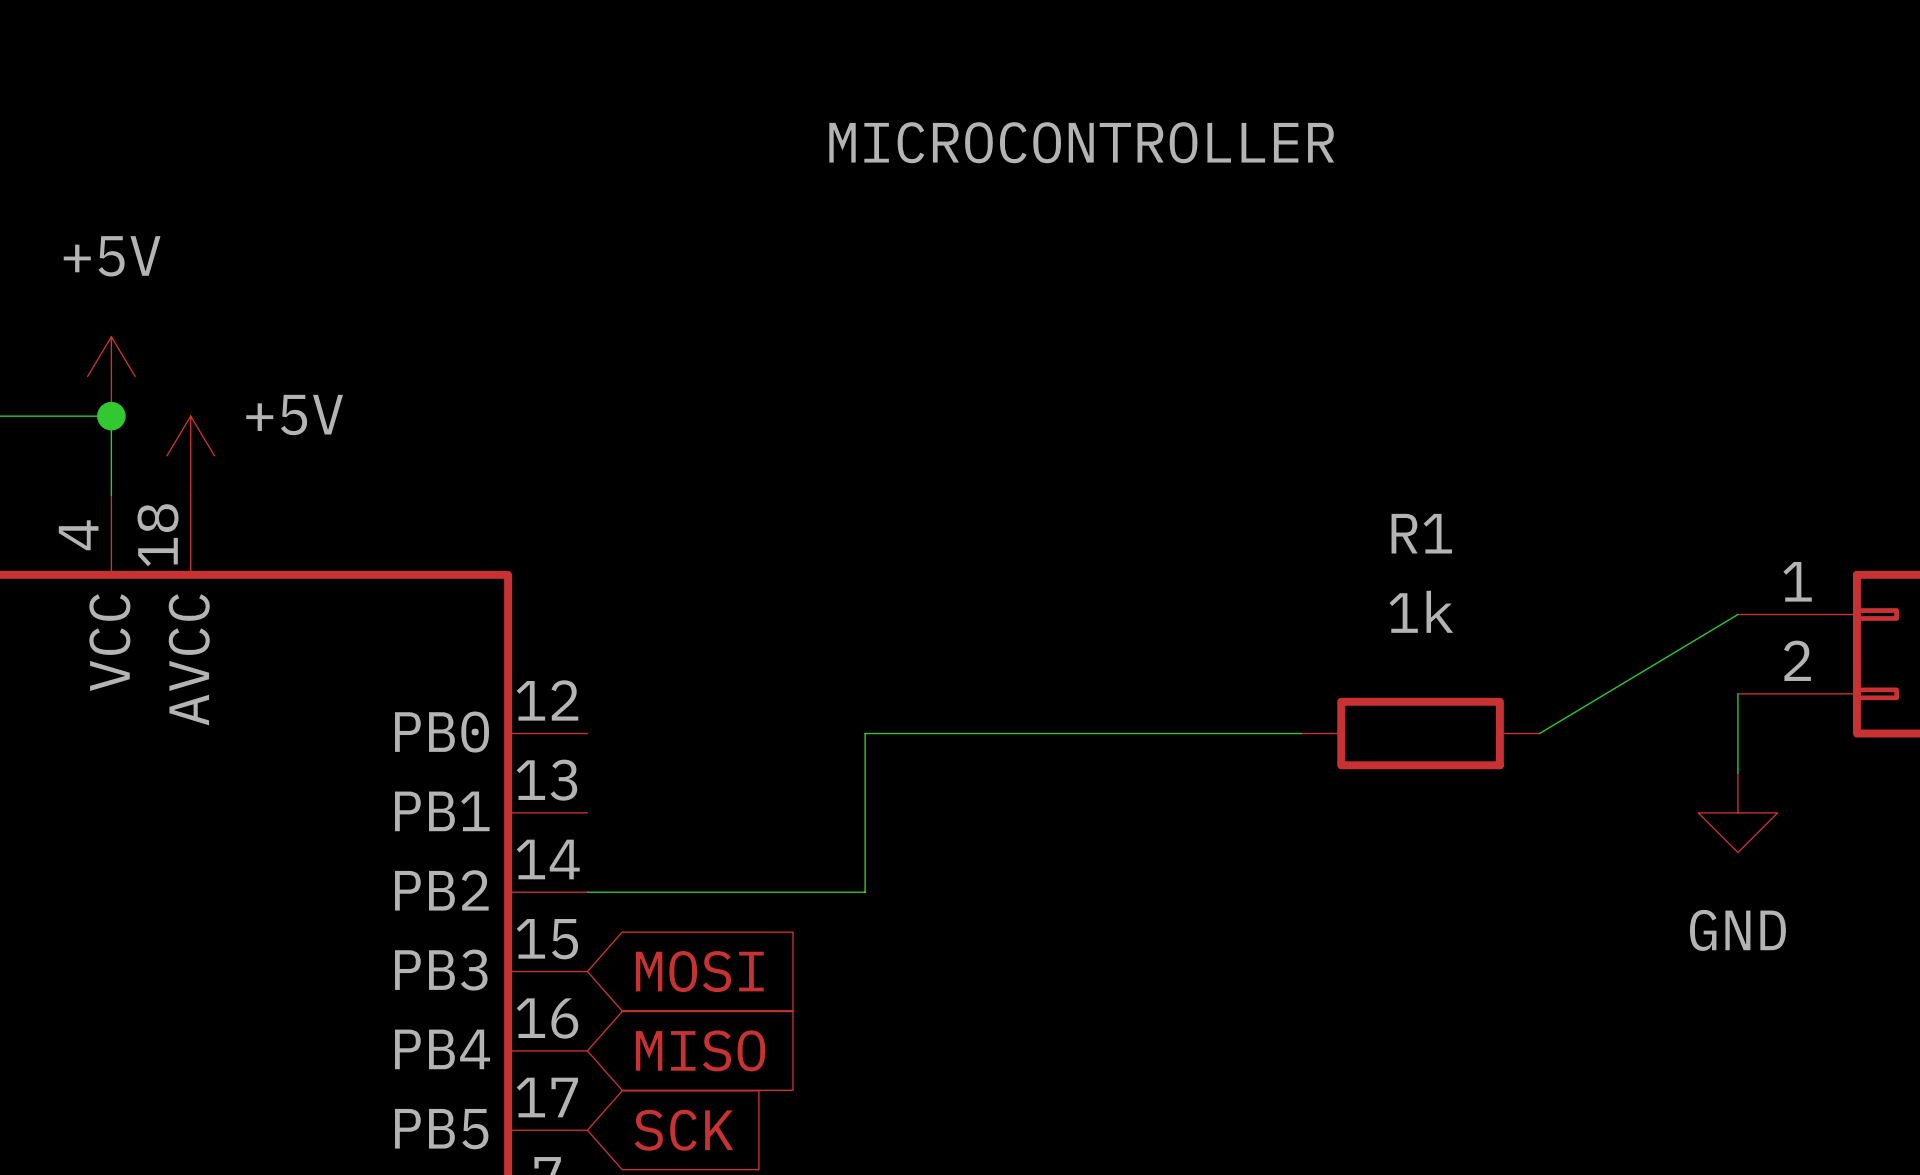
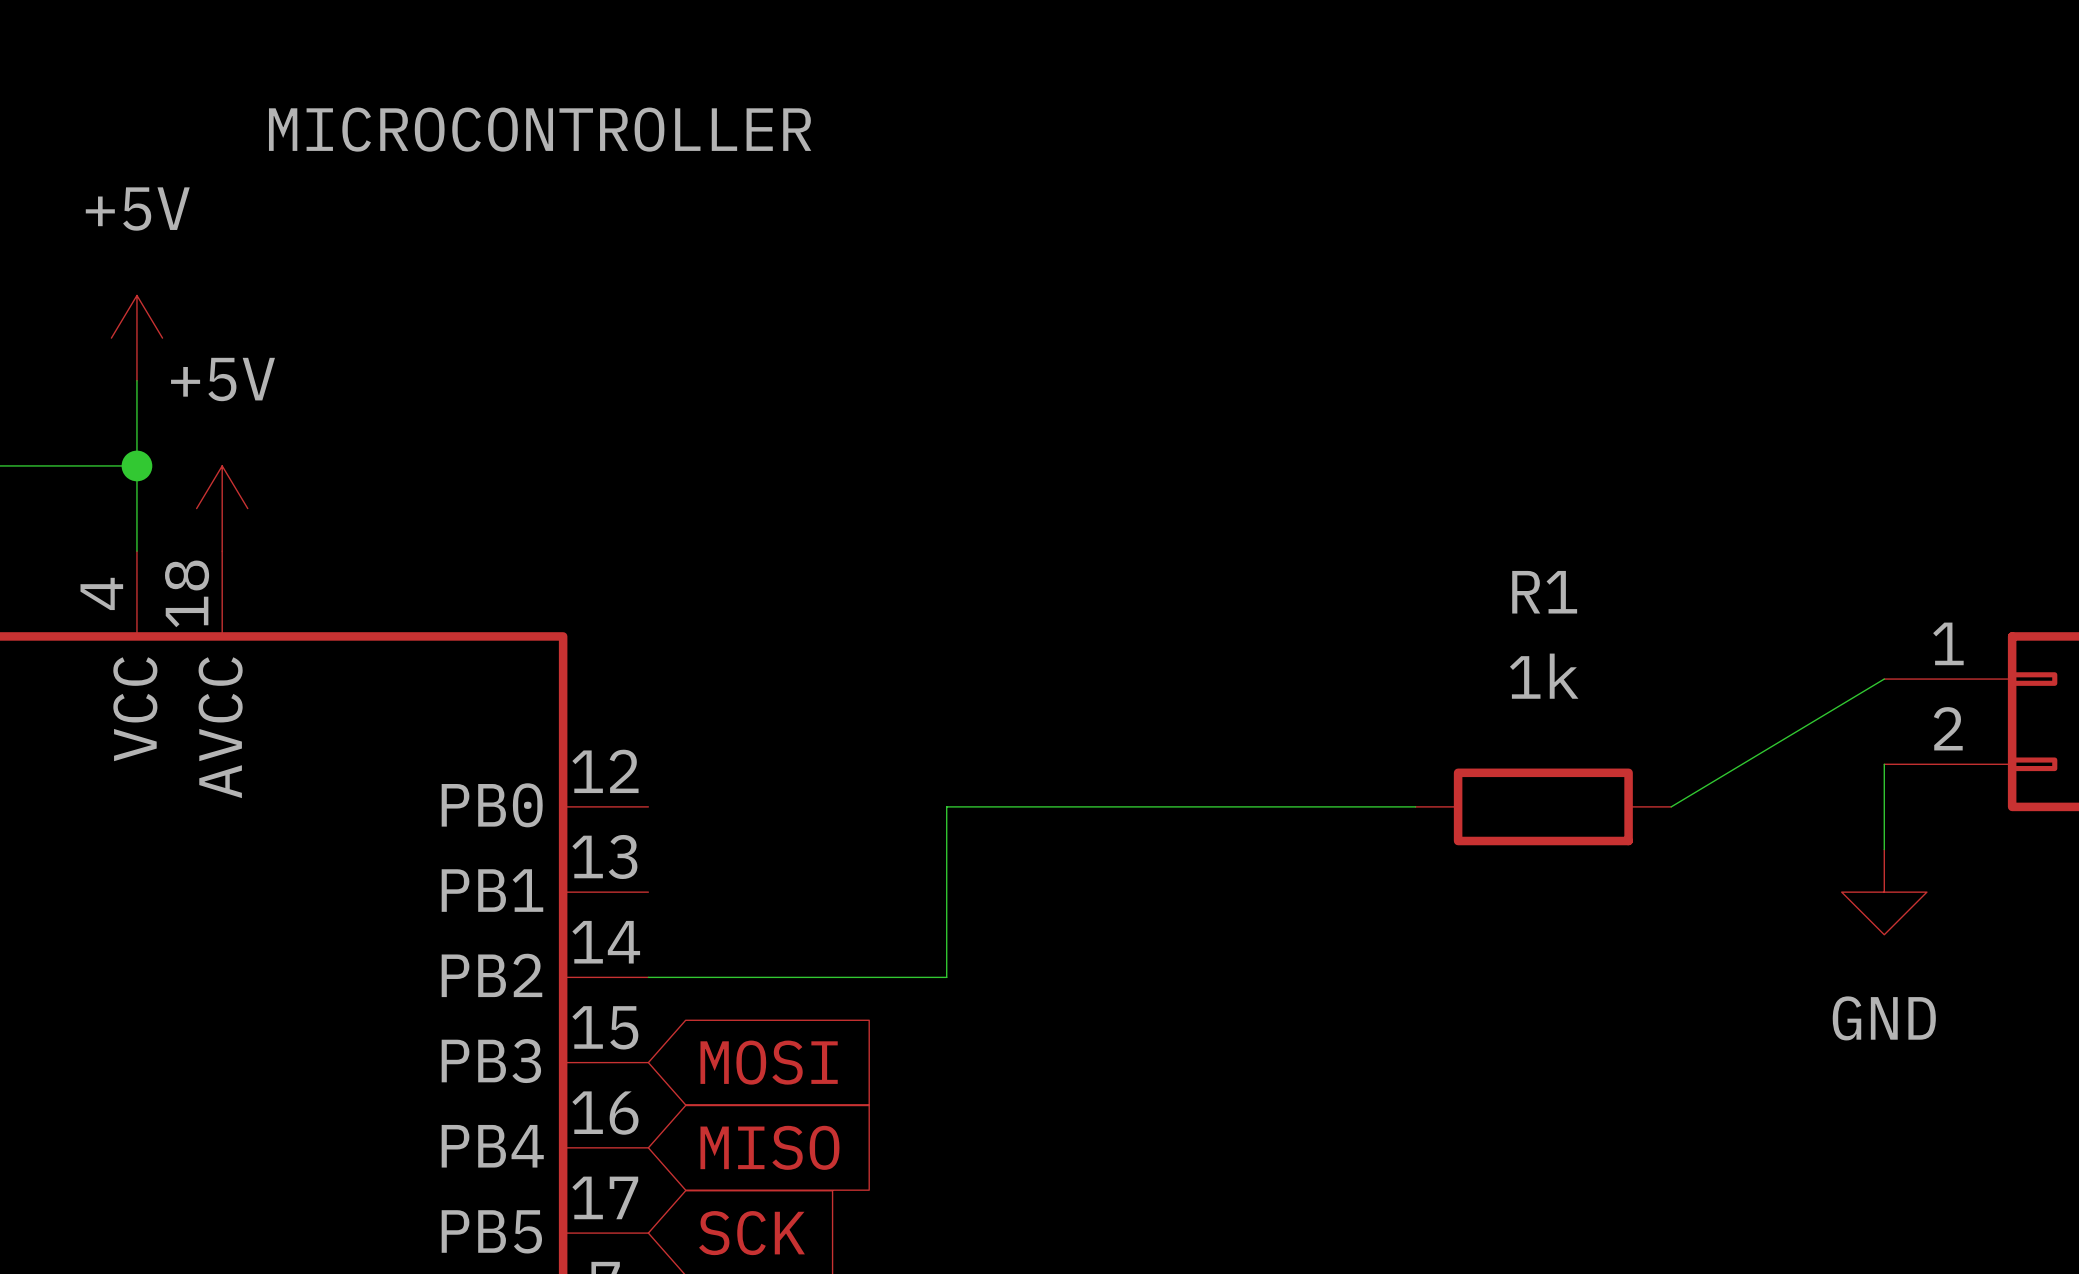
label position: MICROCONTROLLER (1081, 142) -> MICROCONTROLLER (540, 129)
power symbol position: +5V (111, 376) -> +5V (136, 338)
power symbol text position: +5V (294, 415) -> +5V (222, 379)

